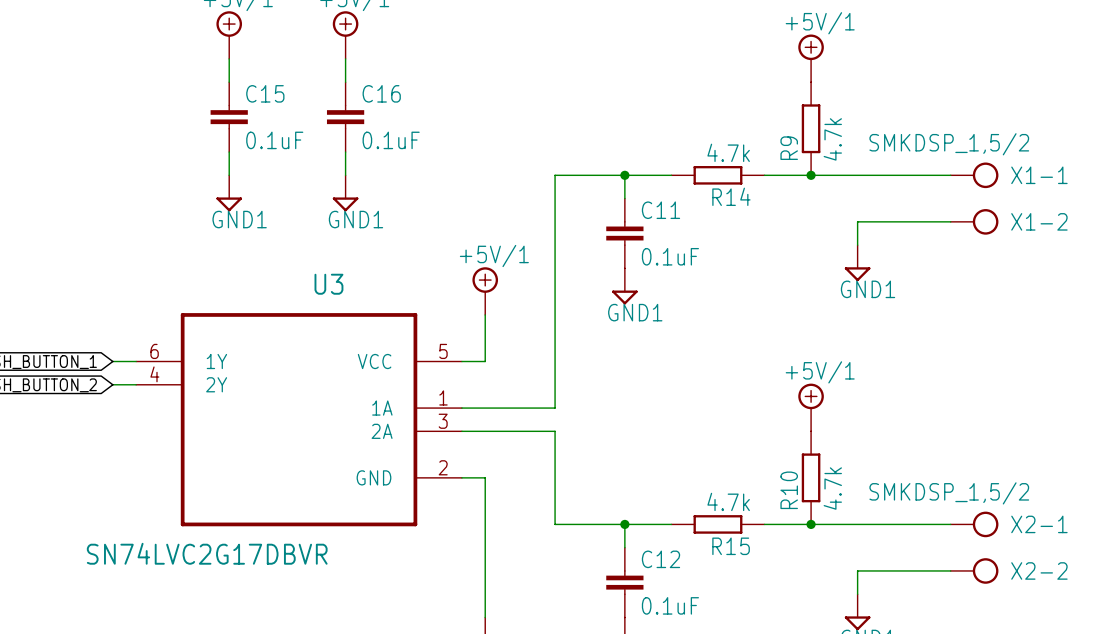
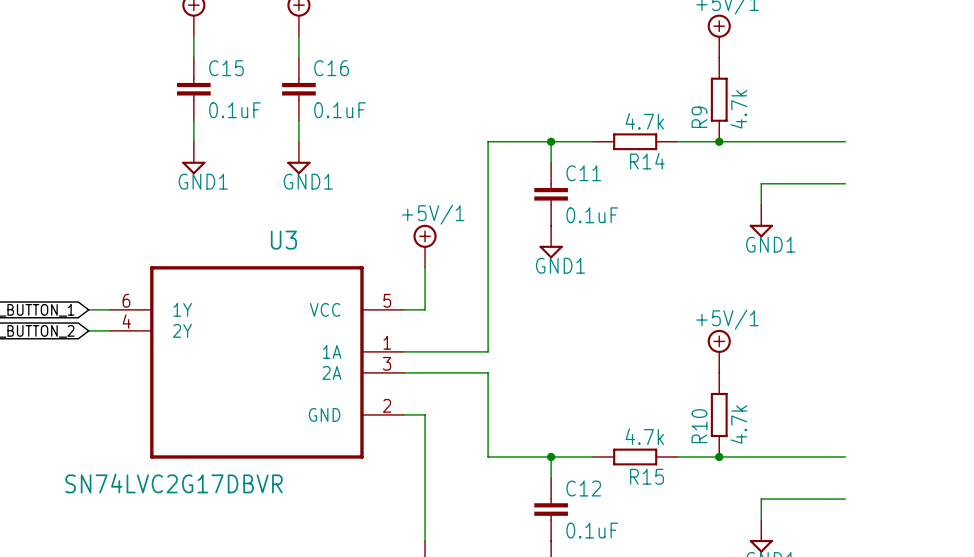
X1-1: SMKDSP_1,5/2 (974, 175) -> none
X1-2: (974, 221) -> none
X2-1: SMKDSP_1,5/2 (974, 524) -> none
X2-2: (974, 570) -> none

